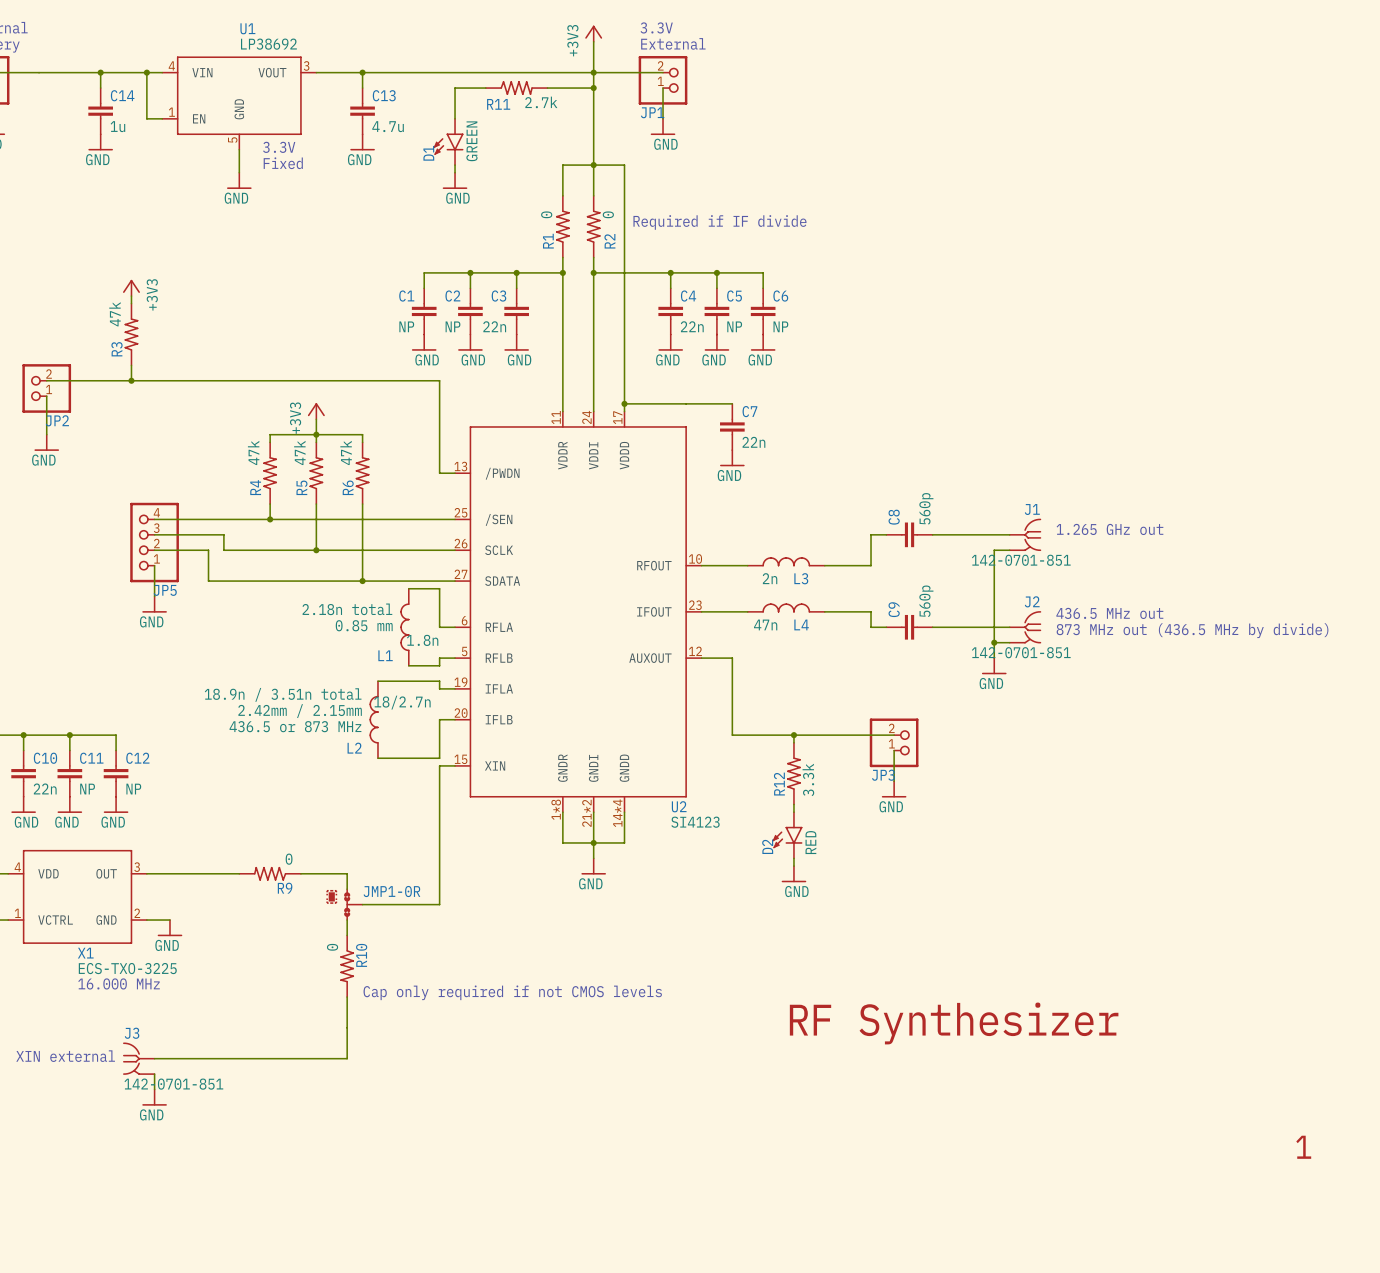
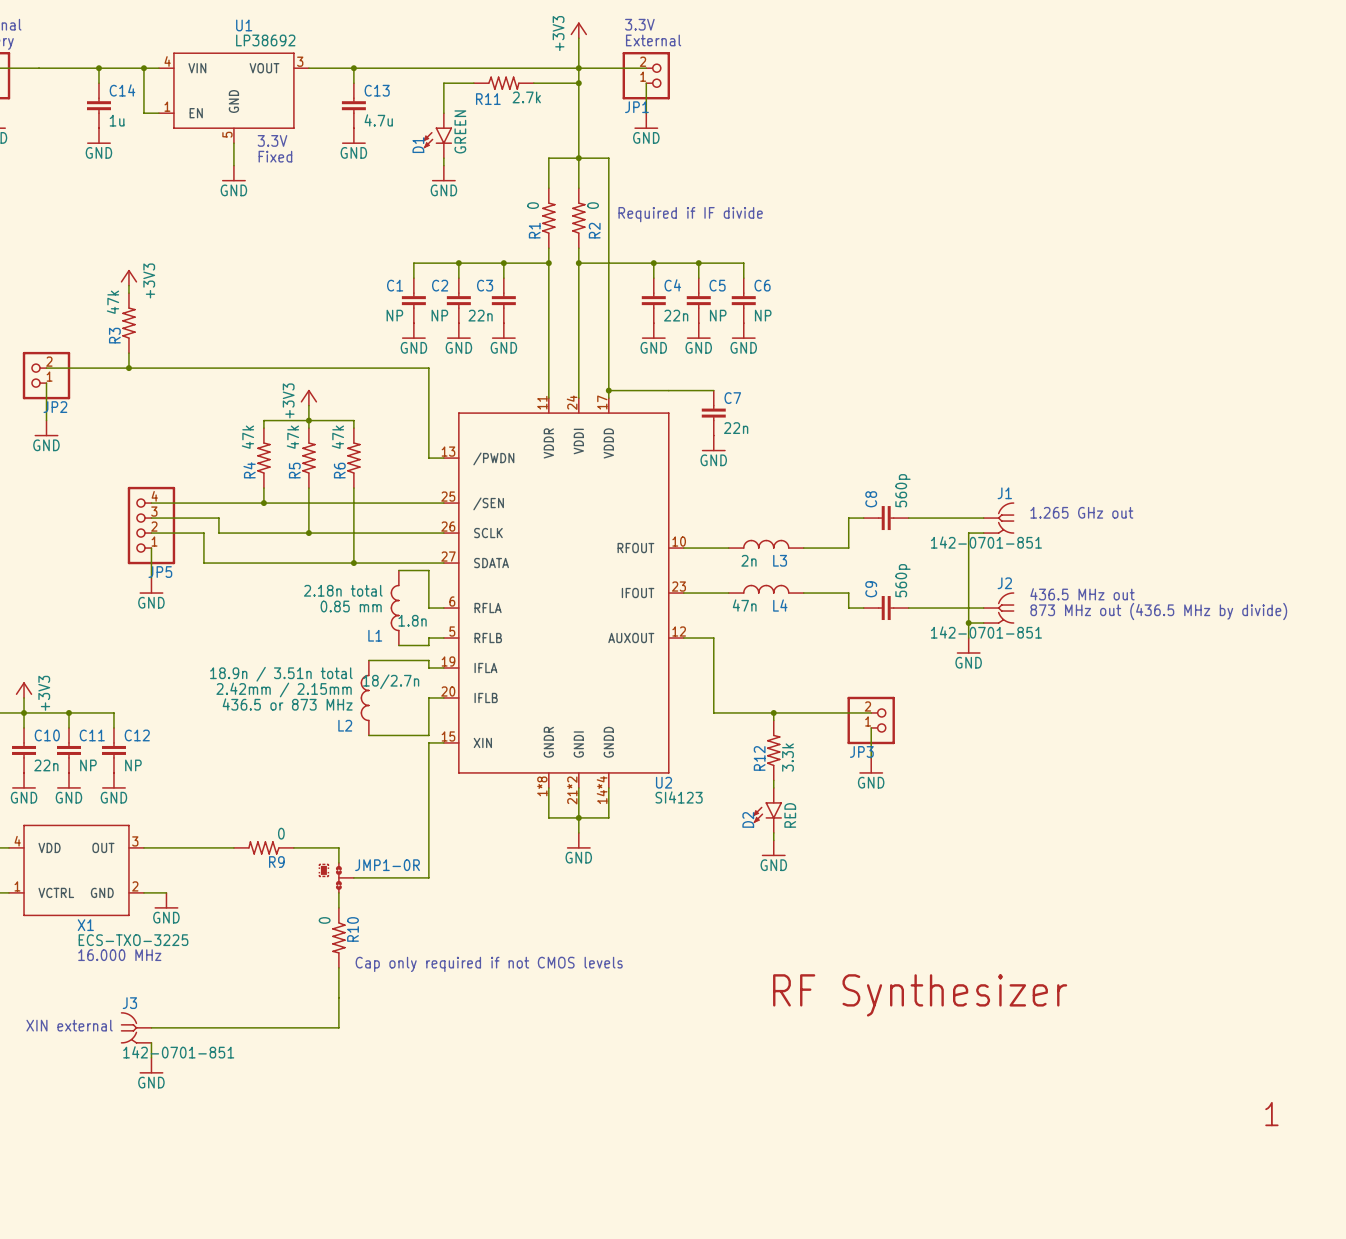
power symbol: none -> +3V3 (24, 690)
wire: none -> (24, 697) (24, 712)

